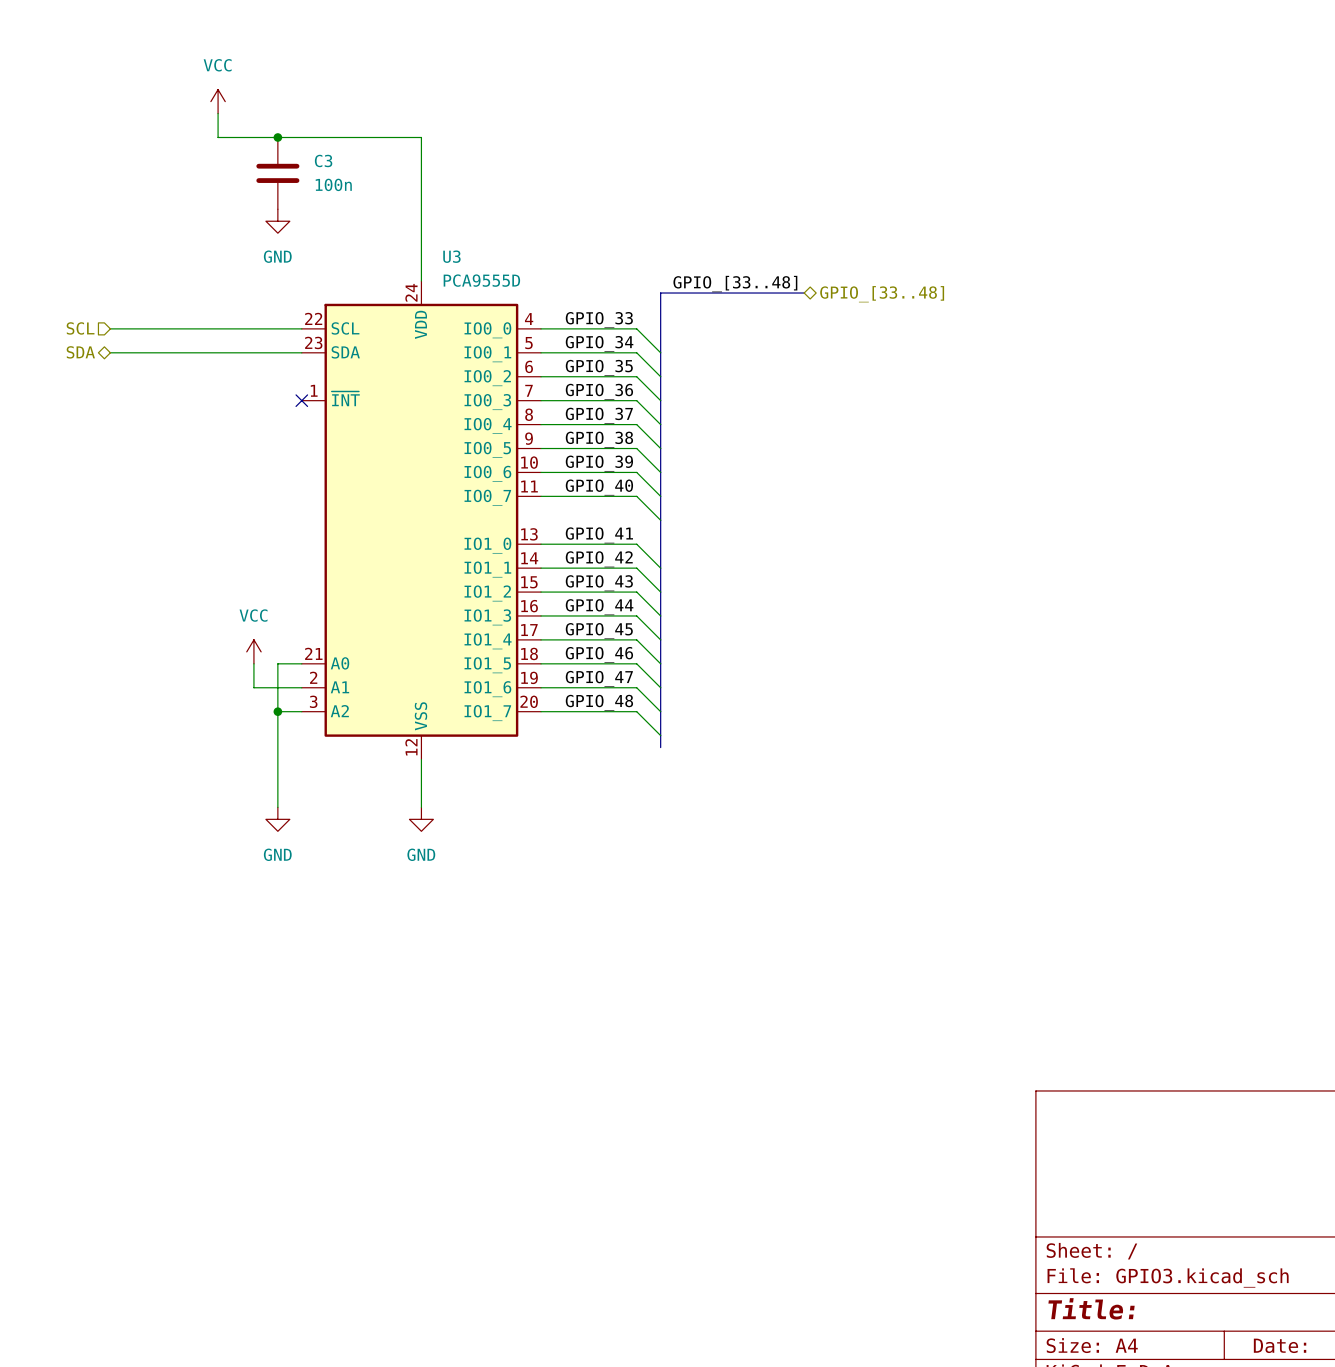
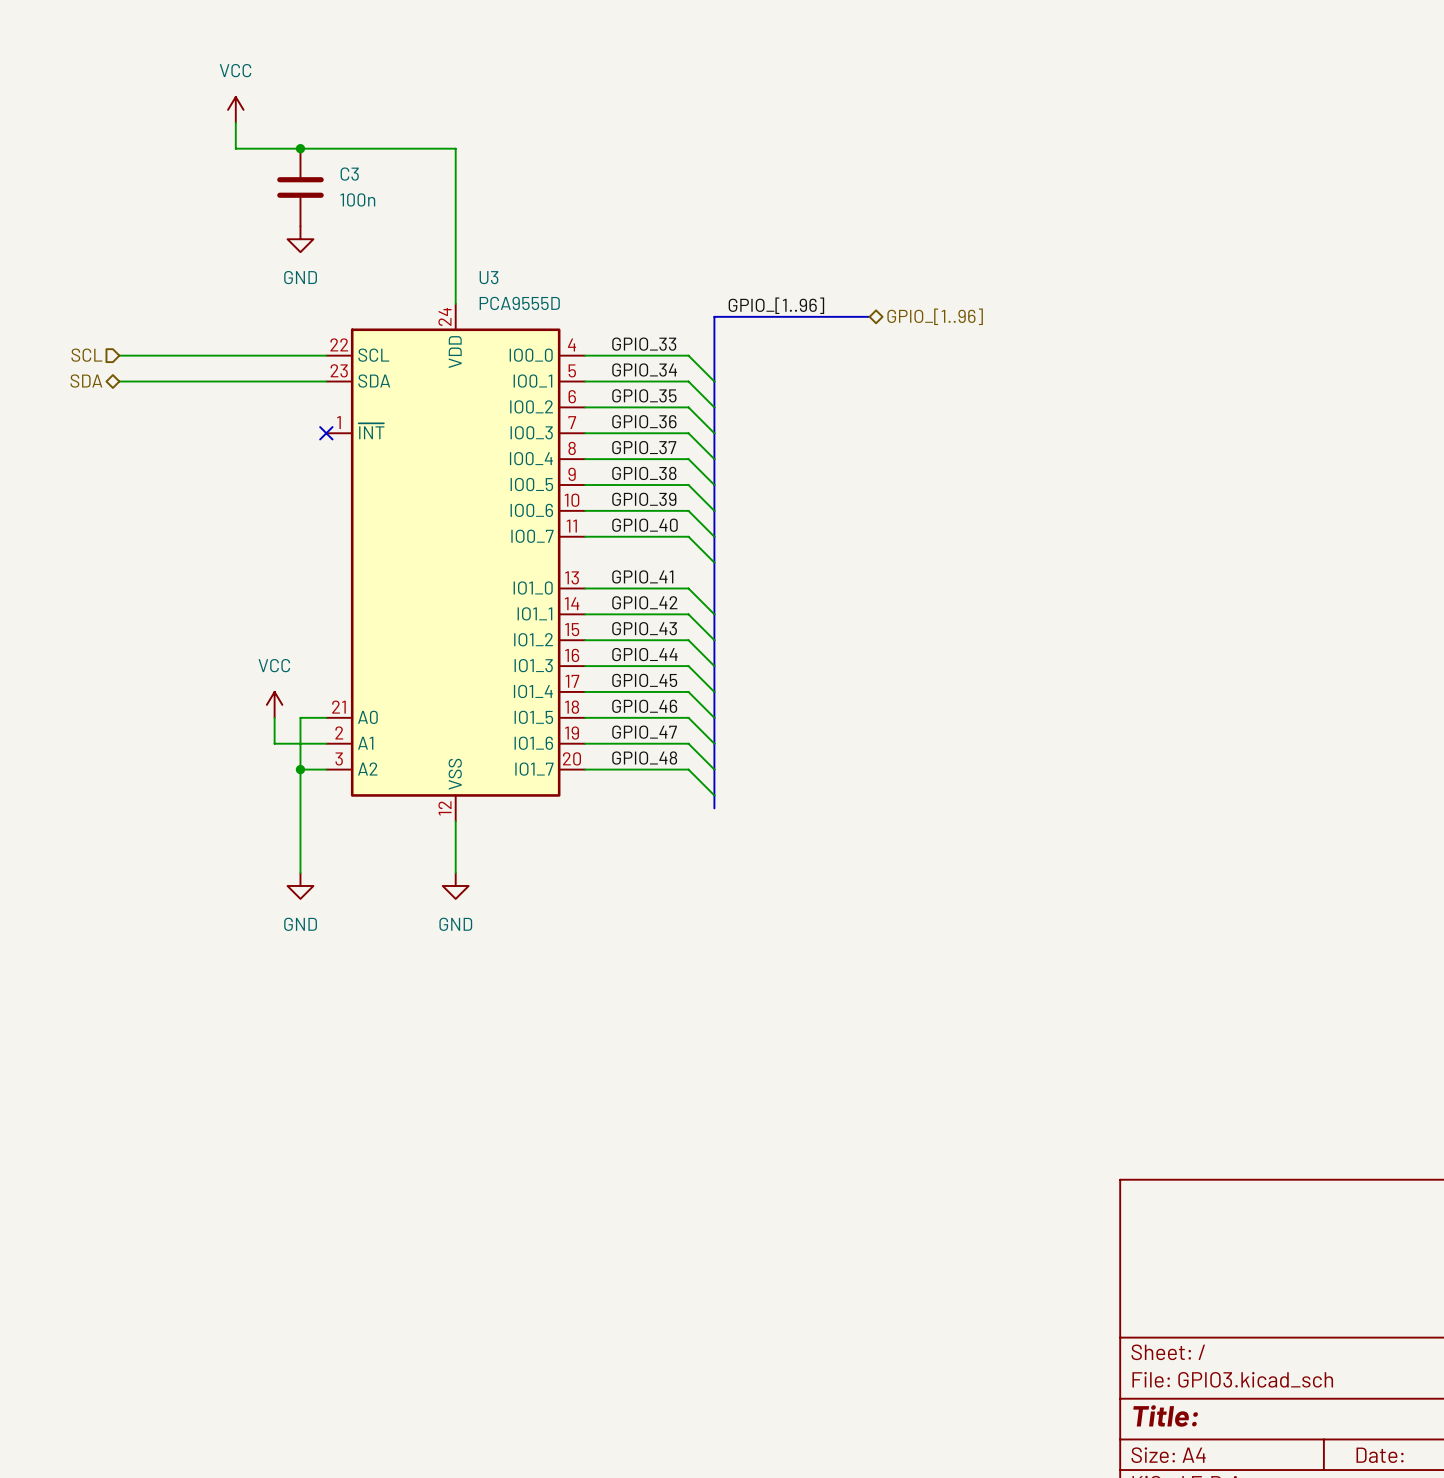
label: GPIO_[33..48] (735, 284) -> GPIO_[1..96] (776, 305)
hierarchical label: GPIO_[33..48] (882, 294) -> GPIO_[1..96] (935, 316)

